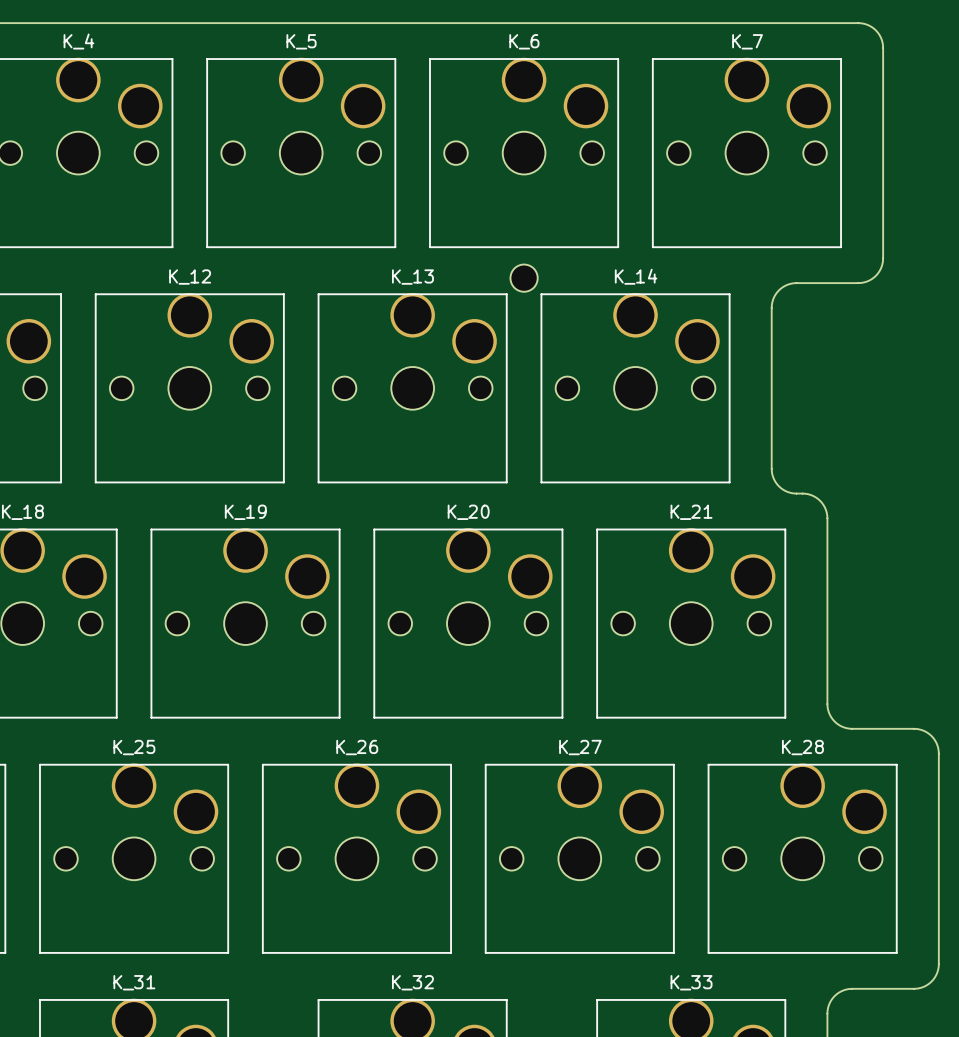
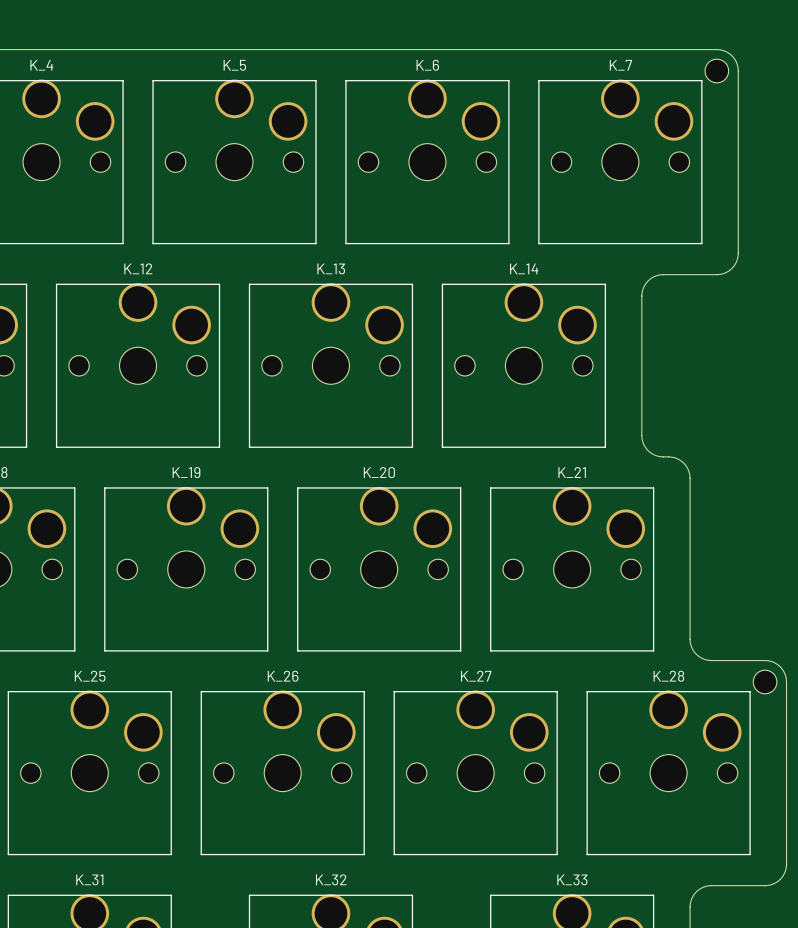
part: none -> (716, 71)
part: (524, 278) -> none
part: none -> (765, 681)

